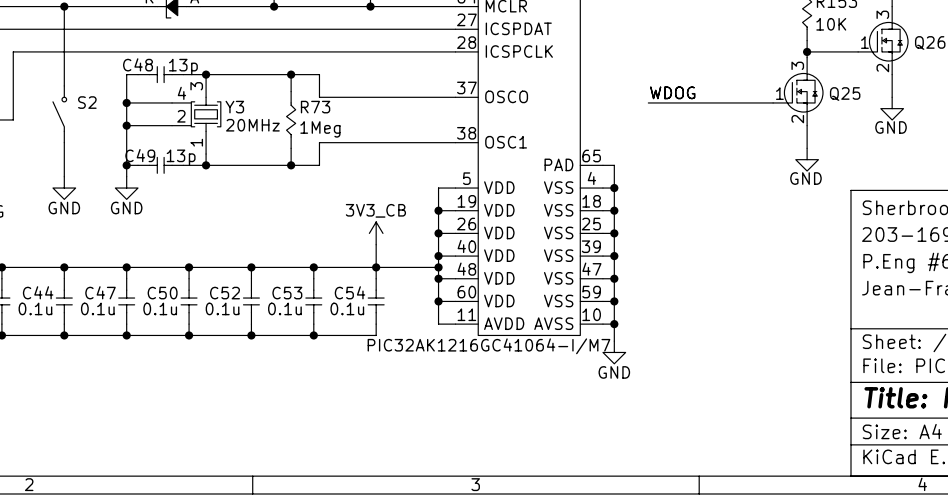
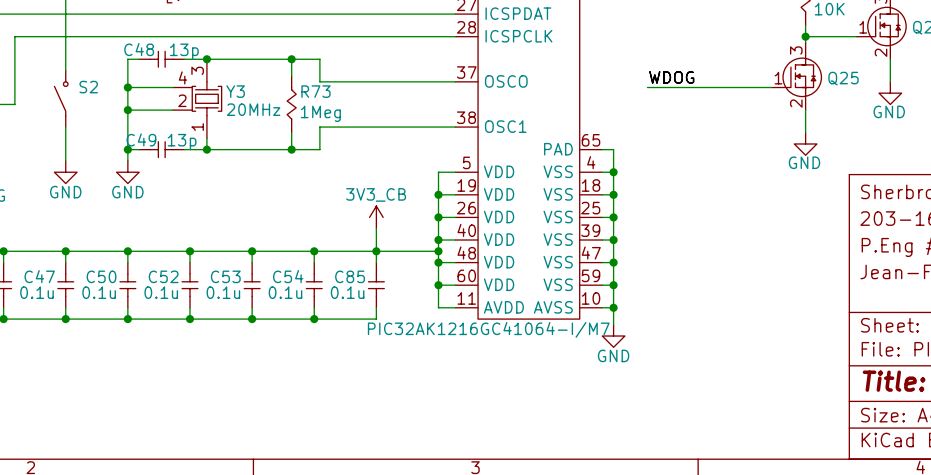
C44 name: C44 (38, 292) -> C47 (39, 276)
C47 name: C47 (100, 292) -> C50 (101, 276)
C54 name: C54 (350, 292) -> C85 (350, 276)
C50 name: C50 (162, 293) -> C52 (163, 276)
C52 name: C52 (224, 293) -> C53 (225, 276)
C53 name: C53 (287, 293) -> C54 (288, 276)

